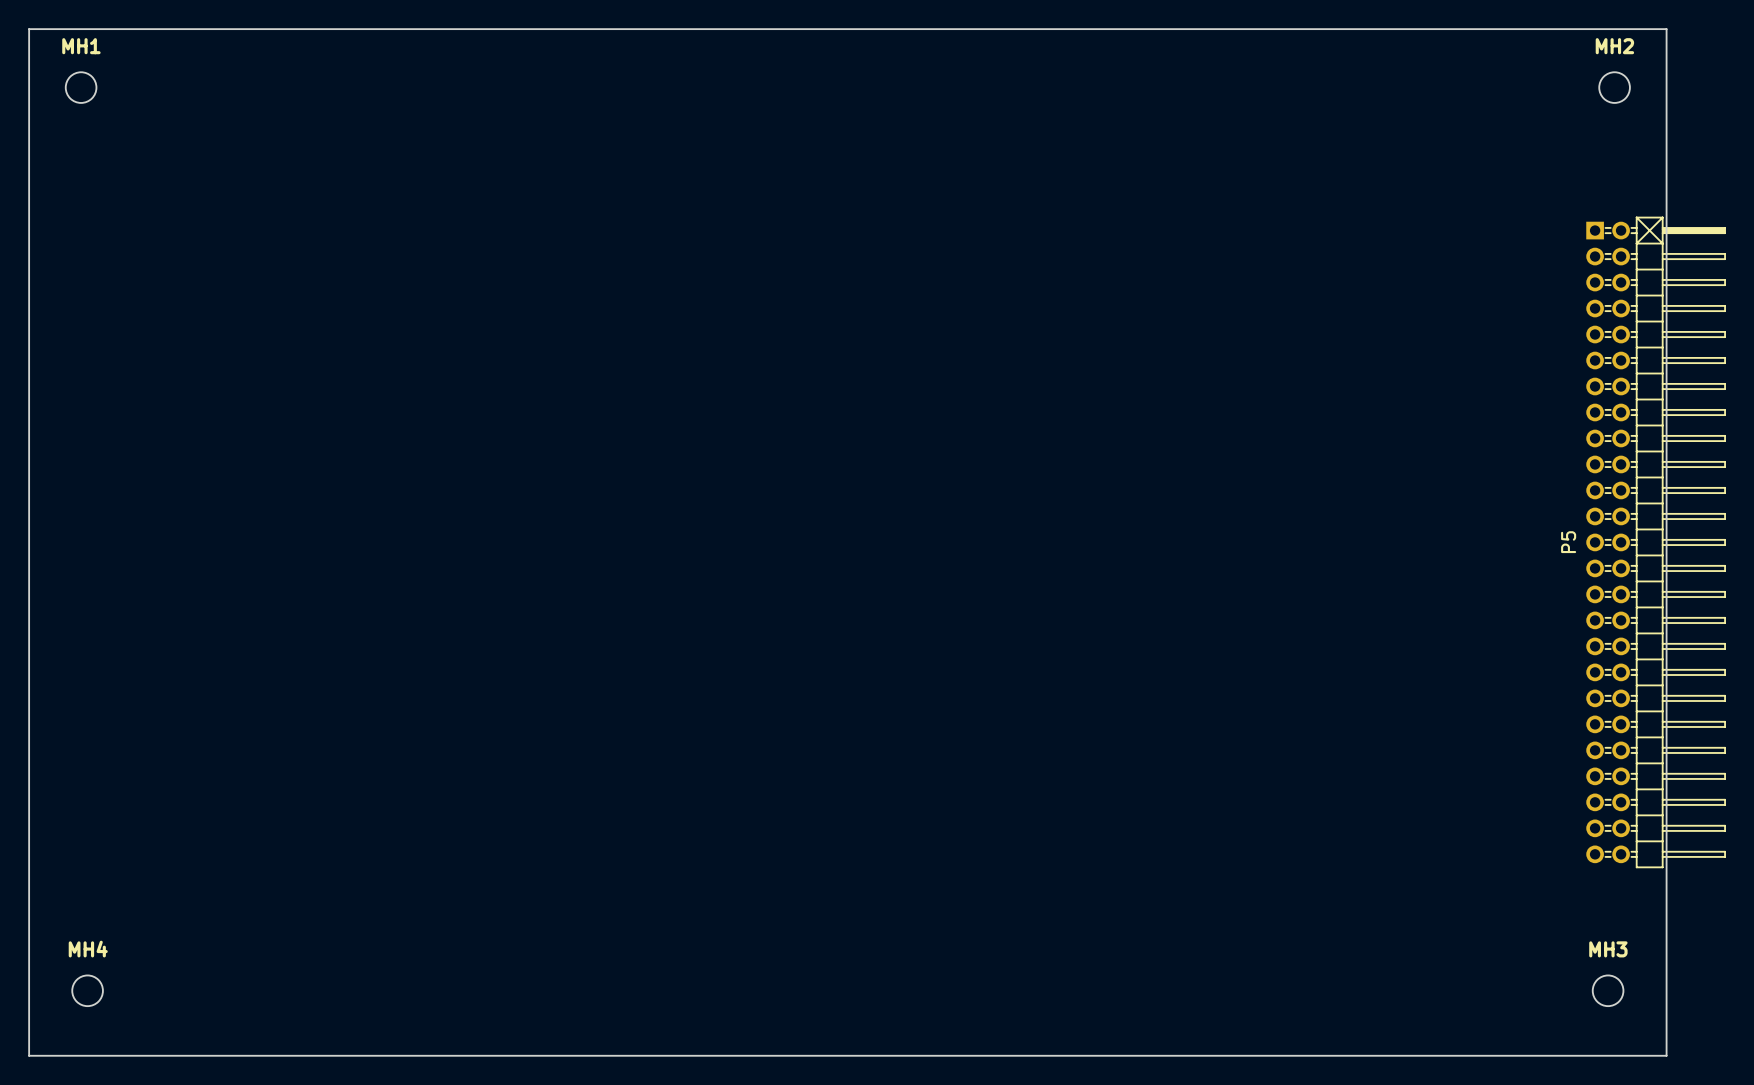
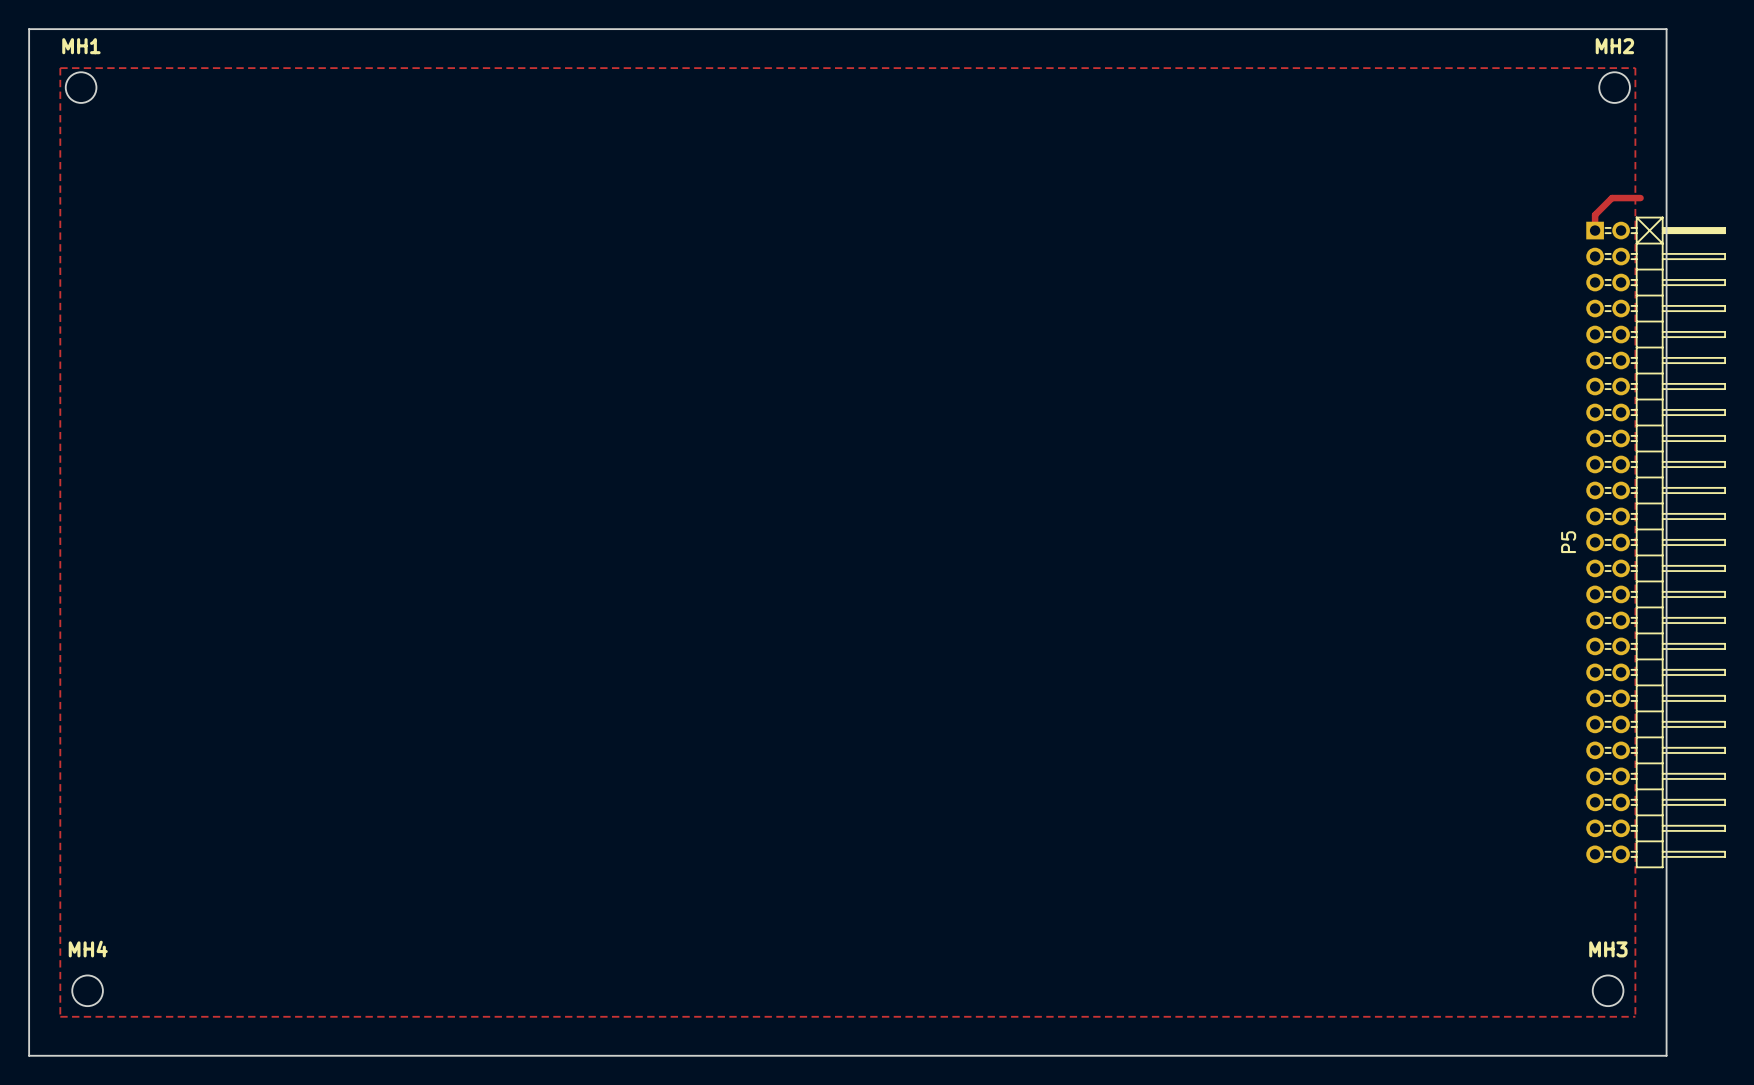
zone outline: none -> (60, 68) (1635, 68) (1635, 1016) (60, 1016) (60, 68)
track: none -> (1640, 198) (1611, 198) (1595, 214) (1595, 230)

